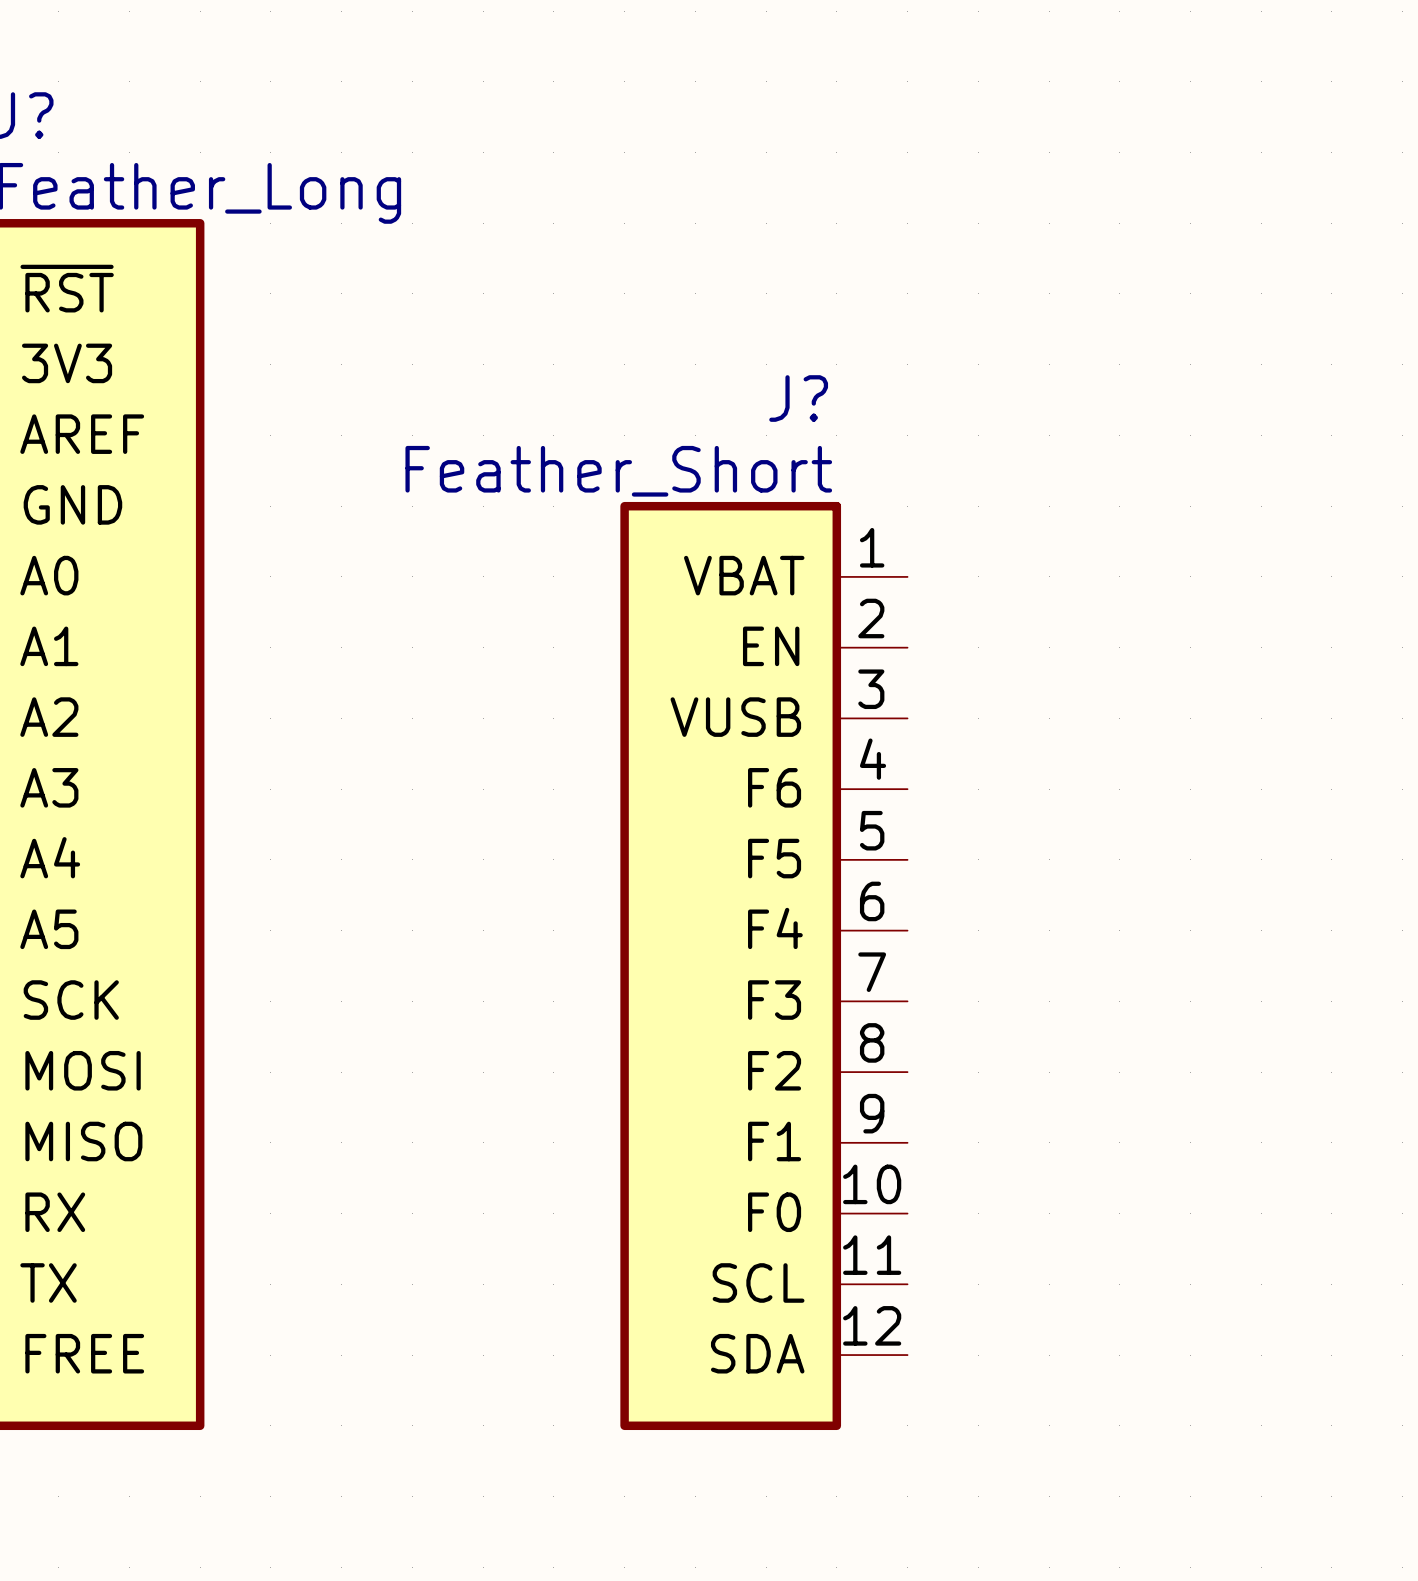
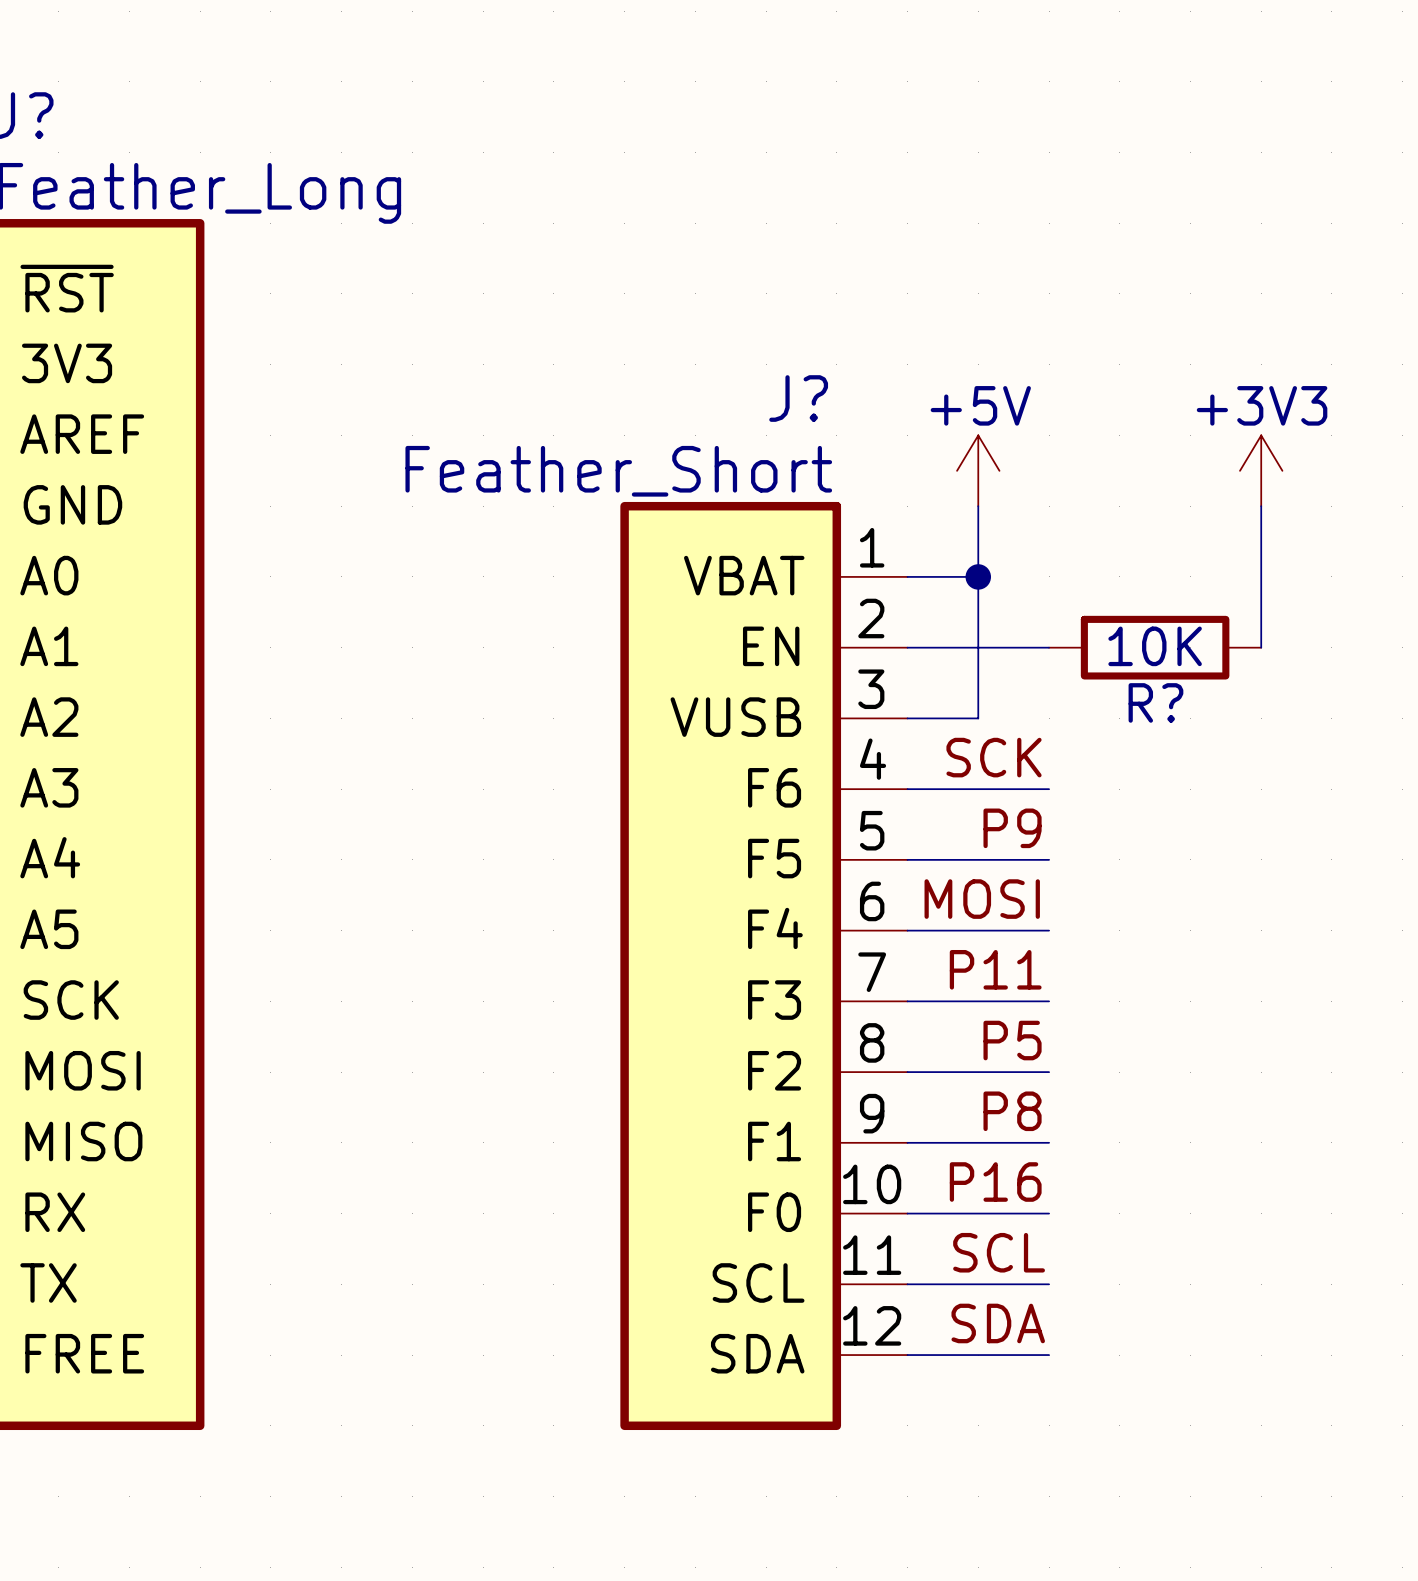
power symbol: none -> +5V (978, 470)
power symbol: none -> +3V3 (1261, 470)
wire: none -> (978, 506) (978, 718) (907, 718)
wire: none -> (1261, 506) (1261, 647)
wire: none -> (907, 576) (978, 576)
junction: none -> (978, 576)
wire: none -> (907, 647) (1049, 647)
R?: none -> 10K (1155, 647)
label: none -> SCK (994, 757)
wire: none -> (907, 789) (1049, 789)
label: none -> P9 (1012, 828)
wire: none -> (907, 859) (1049, 859)
label: none -> MOSI (982, 899)
wire: none -> (907, 930) (1049, 930)
label: none -> P11 (995, 969)
wire: none -> (907, 1001) (1049, 1001)
label: none -> P5 (1012, 1040)
wire: none -> (907, 1072) (1049, 1072)
label: none -> P8 (1012, 1111)
wire: none -> (907, 1142) (1049, 1142)
label: none -> P16 (995, 1182)
wire: none -> (907, 1213) (1049, 1213)
label: none -> SCL (999, 1252)
wire: none -> (907, 1284) (1049, 1284)
label: none -> SDA (998, 1323)
wire: none -> (907, 1355) (1049, 1355)

